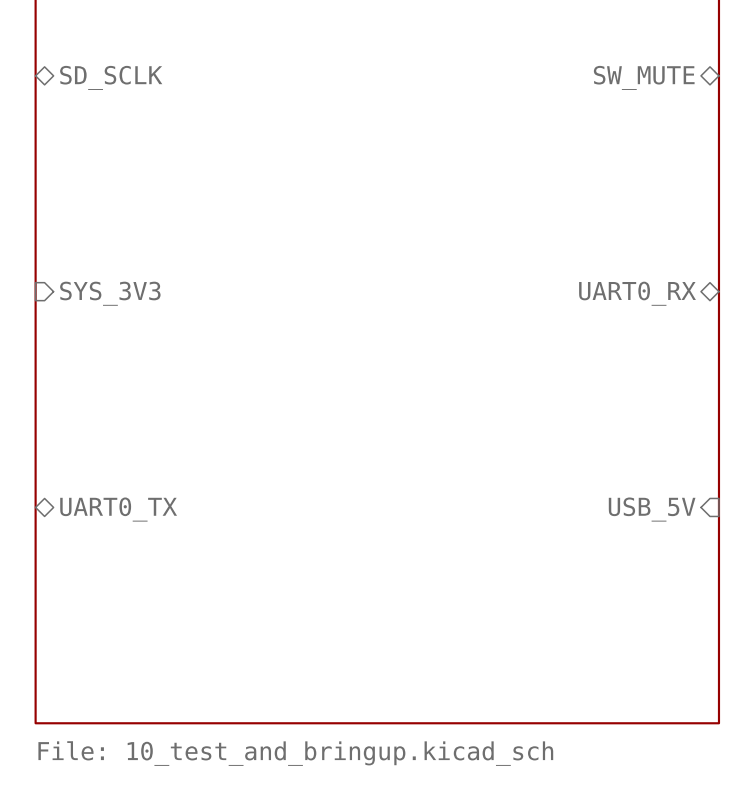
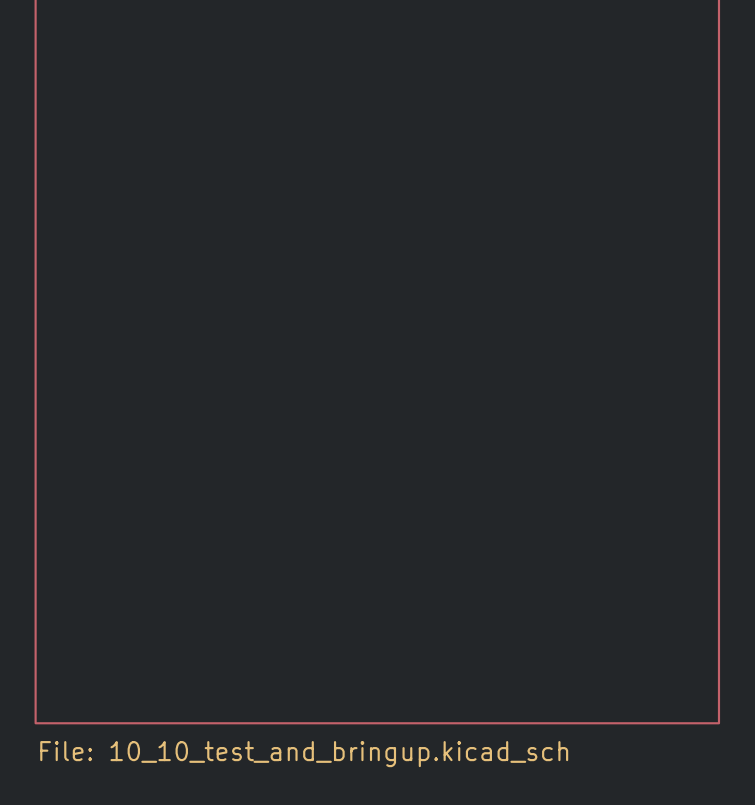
sheet pin: SD_SCLK (111, 77) -> none
sheet pin: SW_MUTE (644, 77) -> none
sheet pin: SYS_3V3 (110, 293) -> none
sheet pin: UART0_RX (637, 293) -> none
sheet pin: UART0_TX (118, 509) -> none
sheet pin: USB_5V (652, 509) -> none
sheet value: File: 10_test_and_bringup.kicad_sch (295, 753) -> File: 10_10_test_and_bringup.kicad_sch (304, 754)

